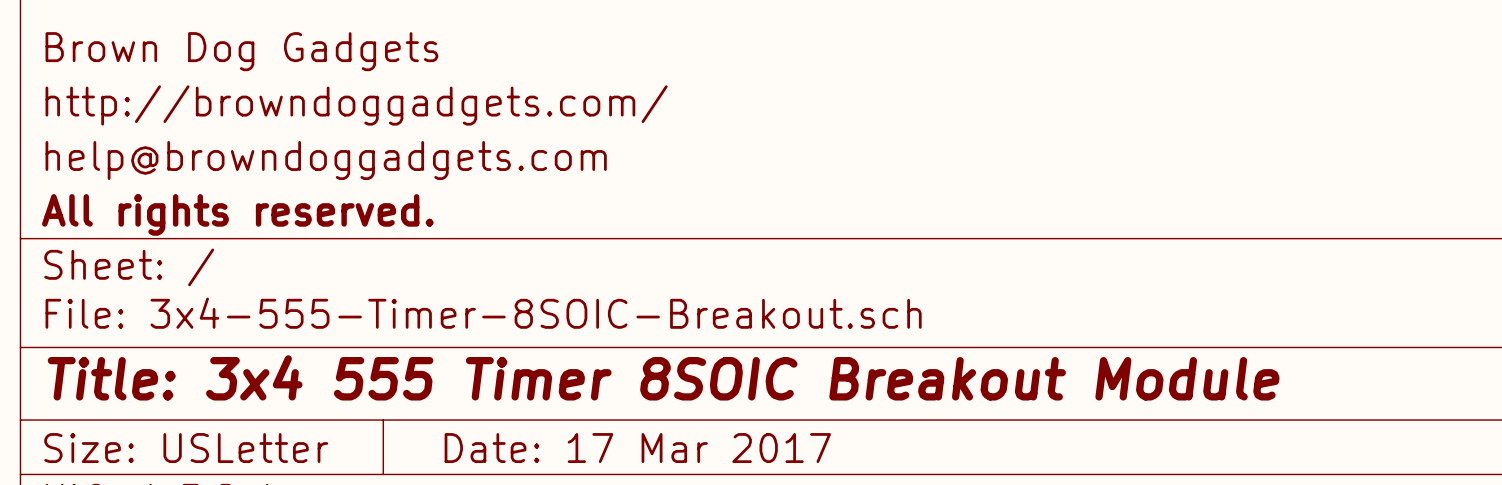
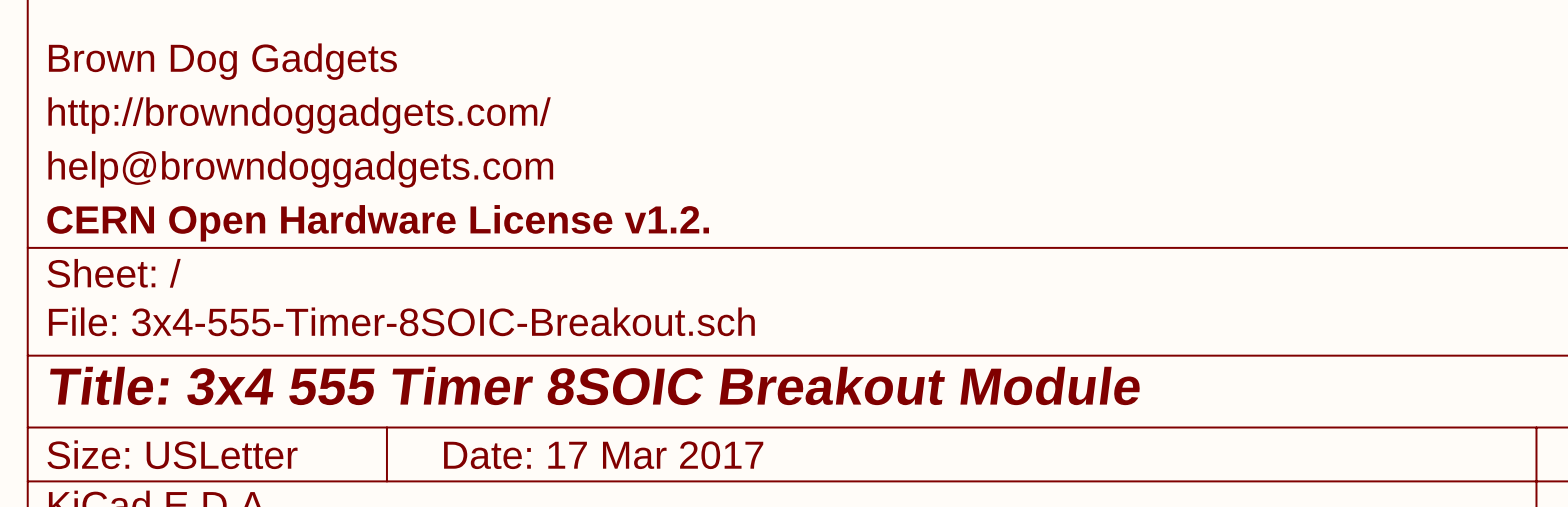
title block: All rights reserved. (237, 214) -> CERN Open Hardware License v1.2. (378, 223)

